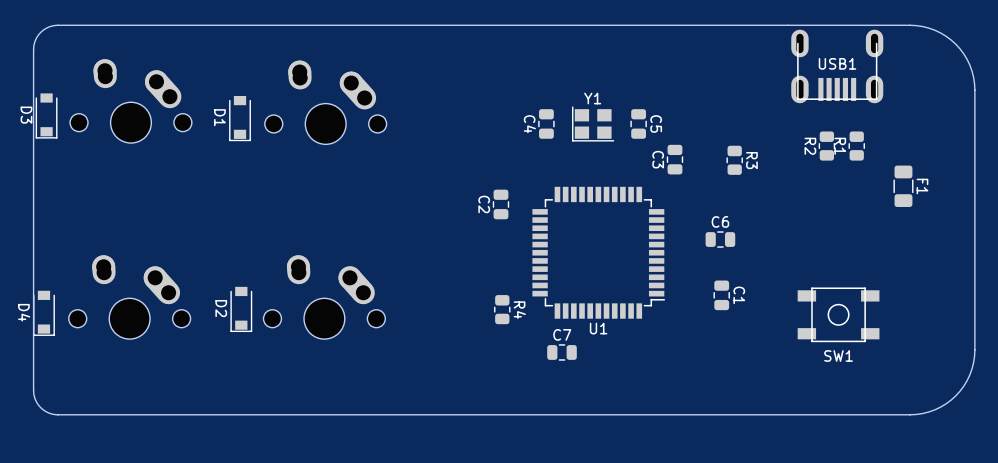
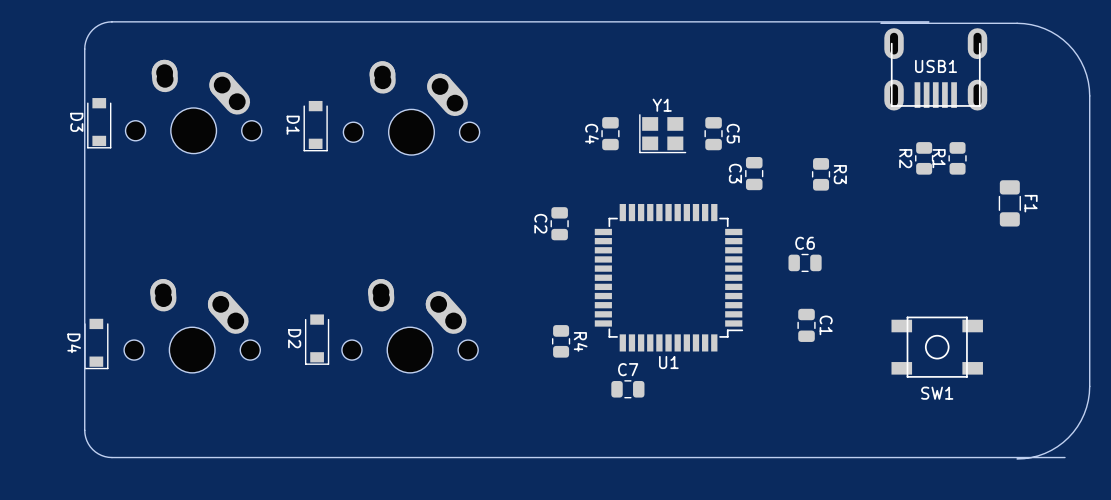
board edge: (788, 25) (57, 25) (48, 27) (38, 34) (33, 49) (34, 396) (43, 409) (57, 414) (909, 414) -> (928, 21) (111, 21) (101, 23) (90, 32) (84, 49) (85, 437) (95, 451) (111, 457) (1065, 457)
part position: (130, 101) -> (193, 106)
part position: (325, 102) -> (411, 108)
D3 position: (46, 115) -> (99, 123)
D1 position: (240, 118) -> (315, 126)
part position: (129, 297) -> (192, 325)
part position: (324, 297) -> (410, 325)
D2 position: (241, 309) -> (317, 339)
D4 position: (43, 313) -> (96, 344)

